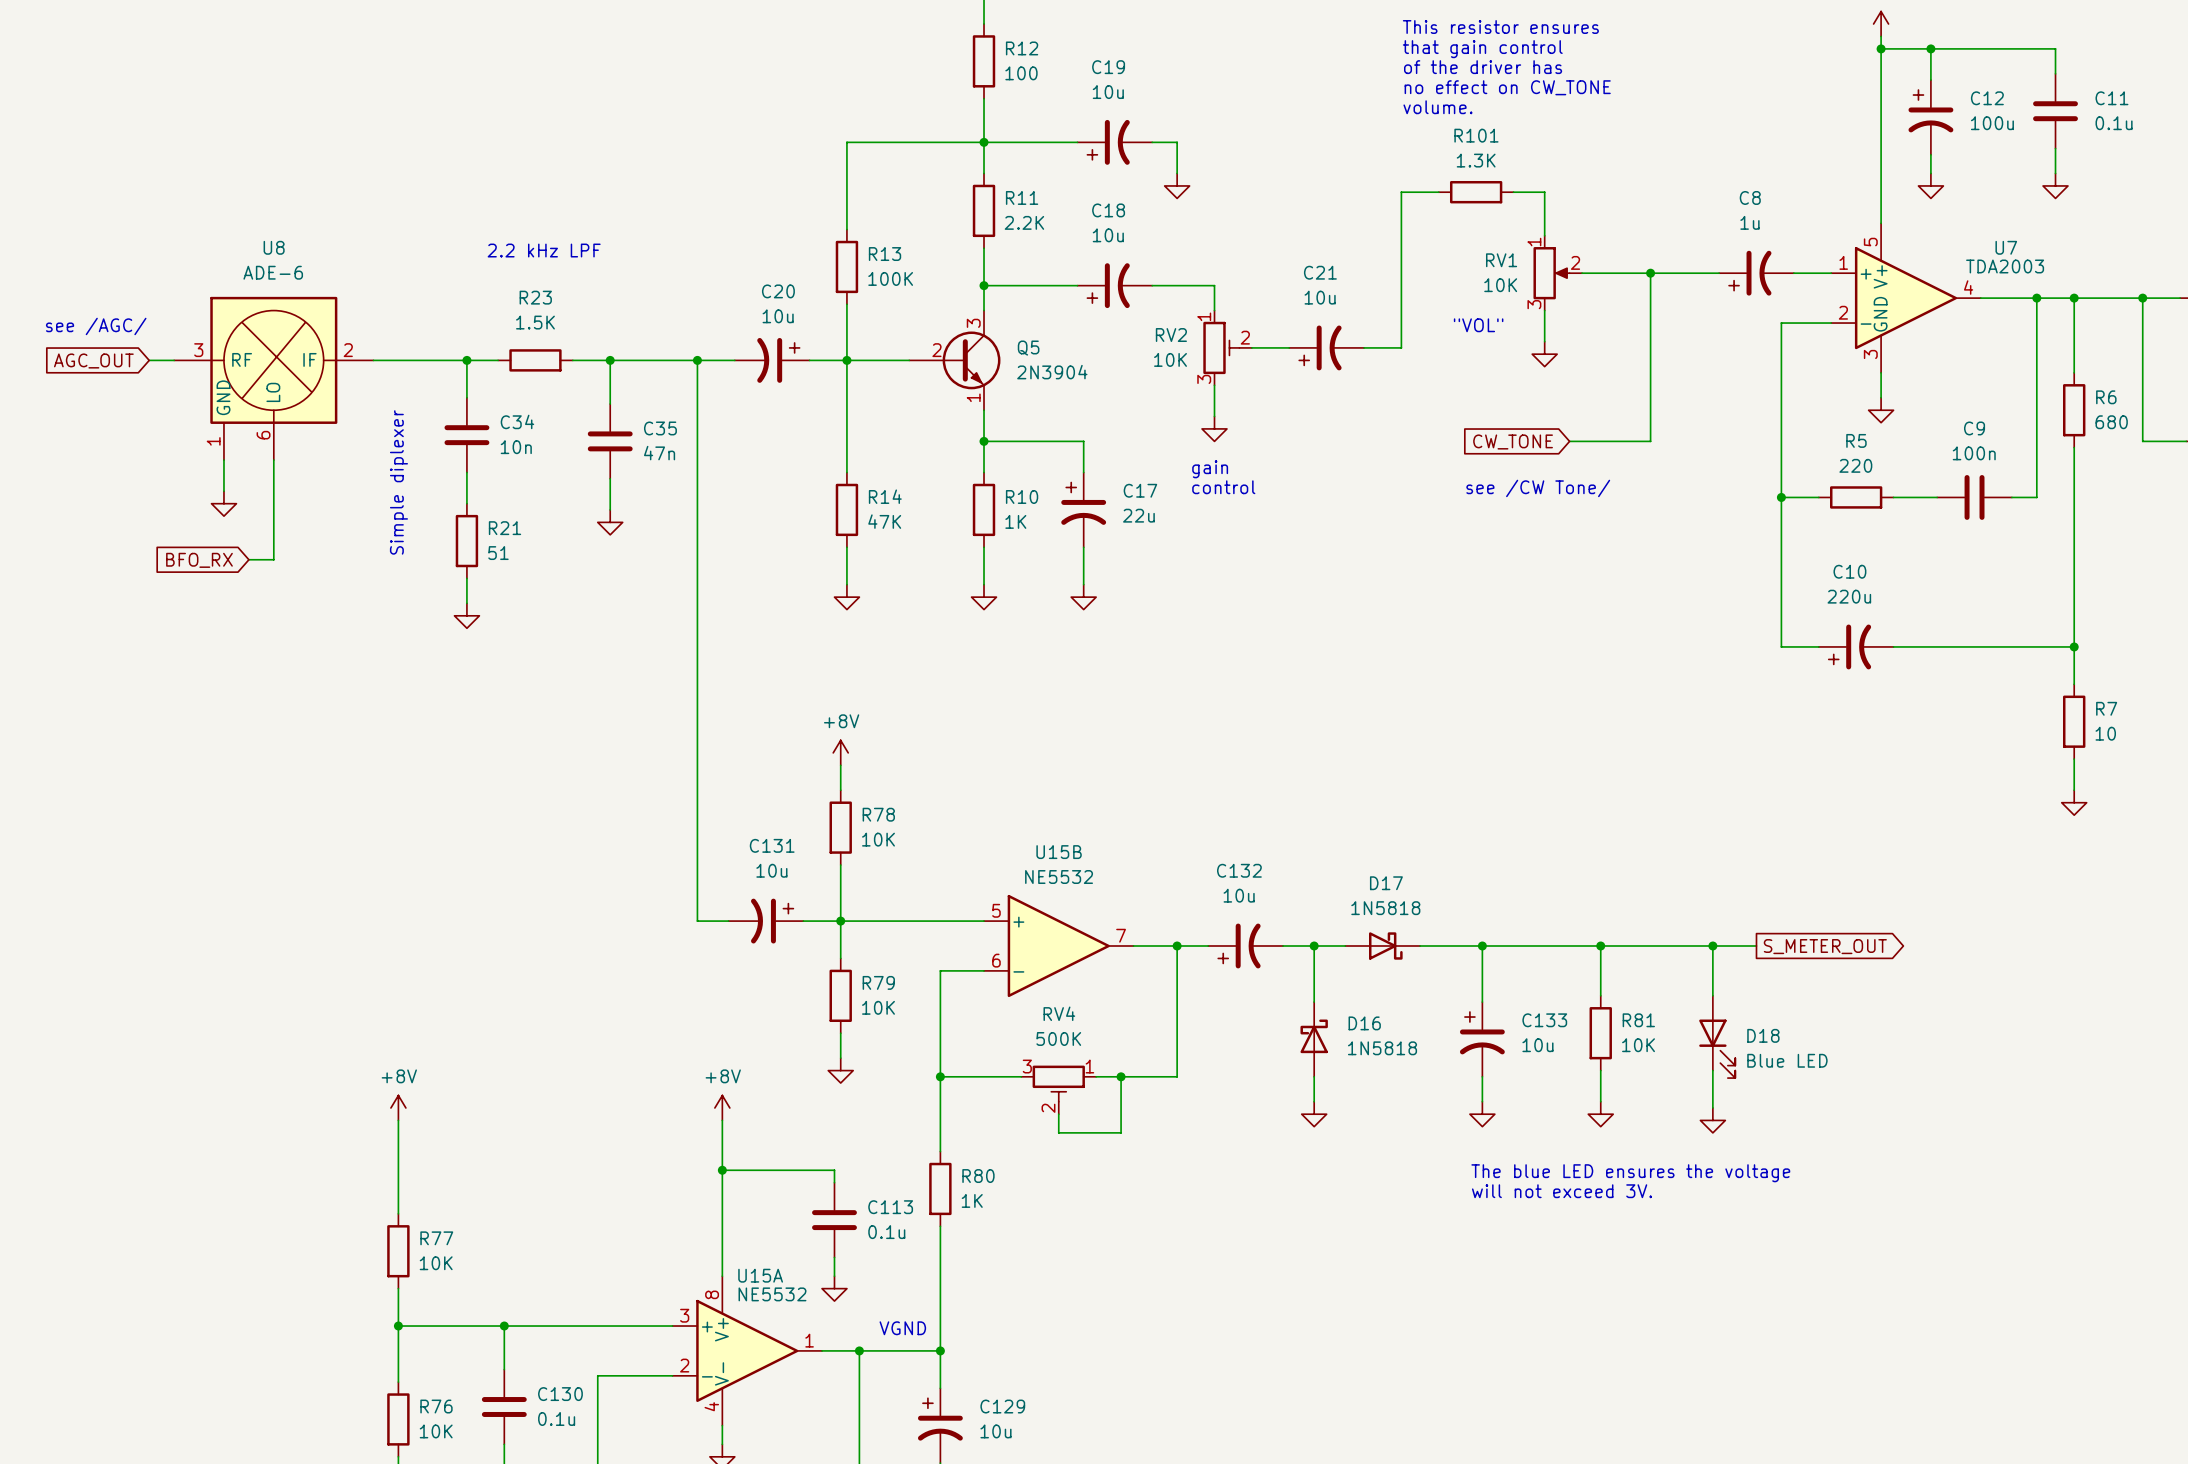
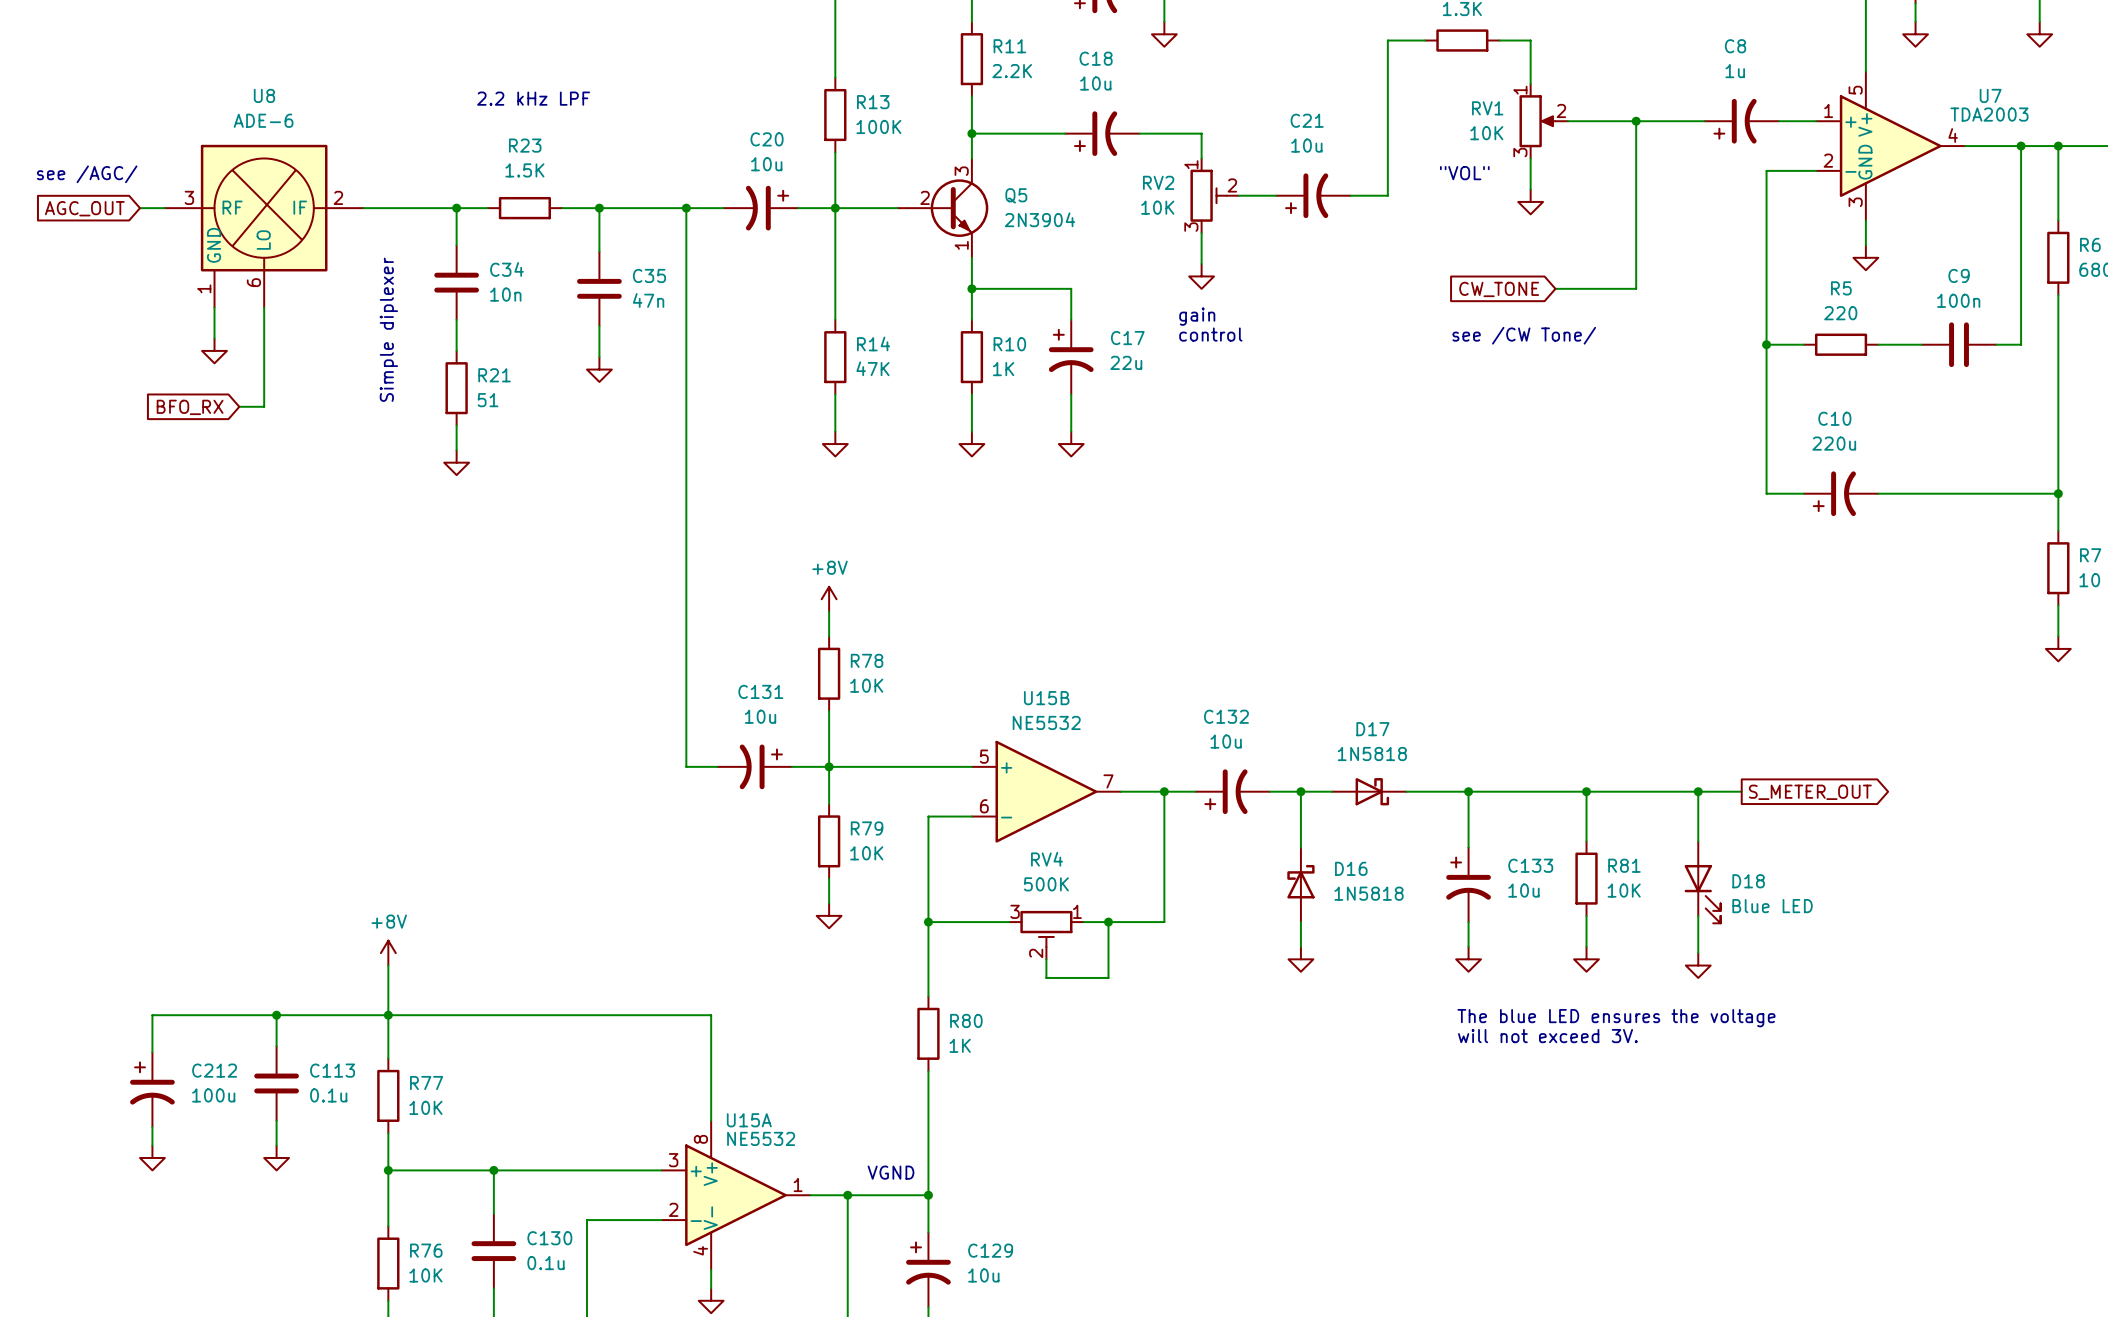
power symbol: +8V (722, 1107) -> none
wire: (722, 1120) (722, 1170) (834, 1170) (834, 1182) -> none
wire: none -> (276, 1015) (276, 1046)
junction: none -> (276, 1015)
junction: none -> (388, 1015)
wire: none -> (711, 1015) (152, 1015) (152, 1052)
junction: (722, 1170) -> none
C113 position: (834, 1220) -> (276, 1083)
C212: none -> 100u (152, 1089)
wire: (834, 1257) (834, 1276) -> none
wire: none -> (276, 1120) (276, 1145)
wire: none -> (152, 1126) (152, 1145)
power symbol: (834, 1288) -> none
power symbol: none -> (152, 1157)
power symbol: none -> (276, 1157)

